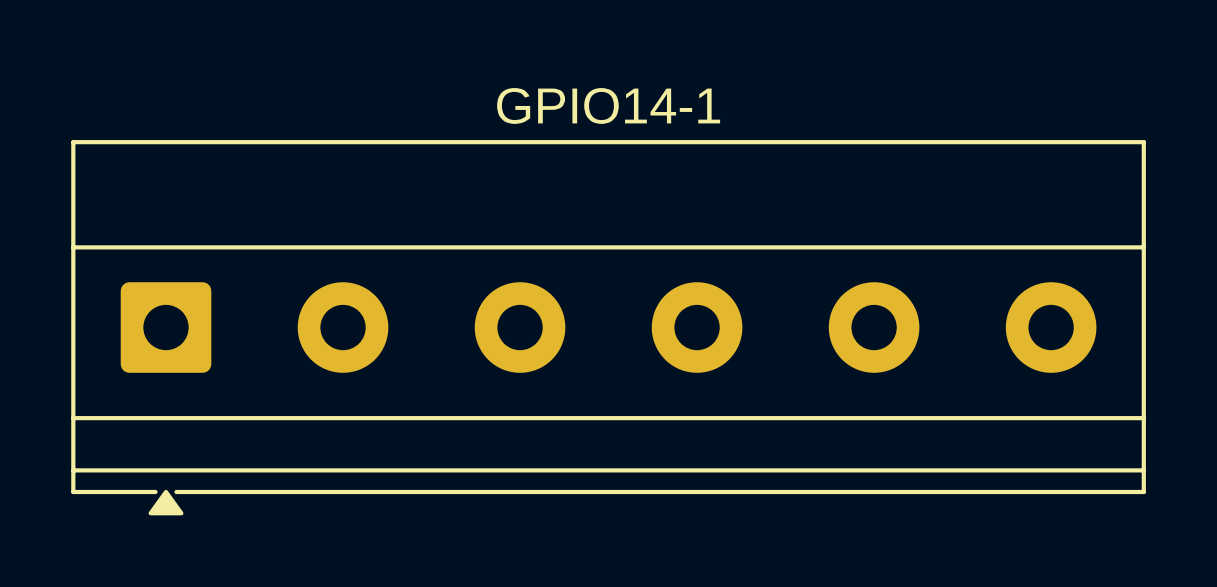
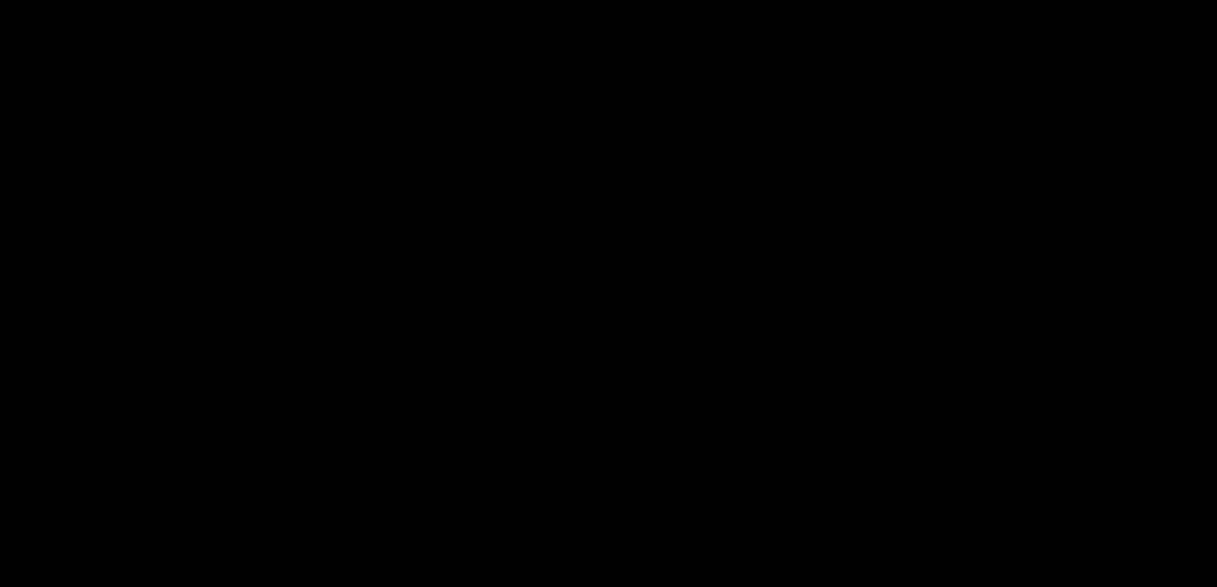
GPIO14-1: (608, 327) -> none

